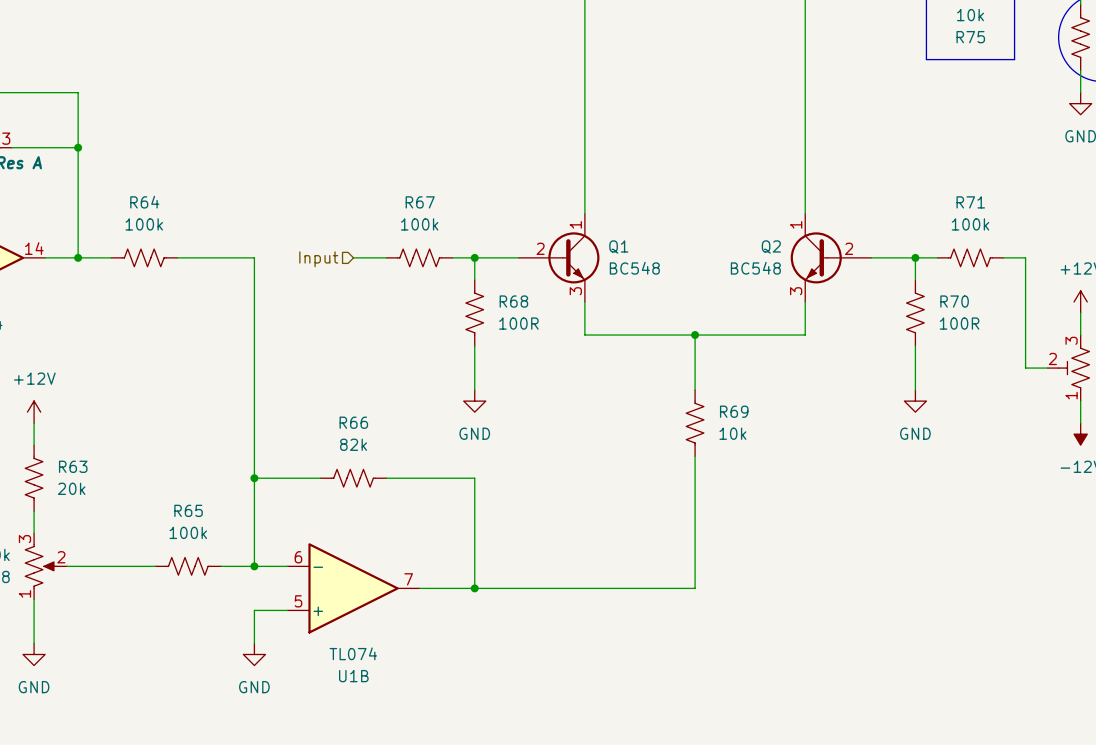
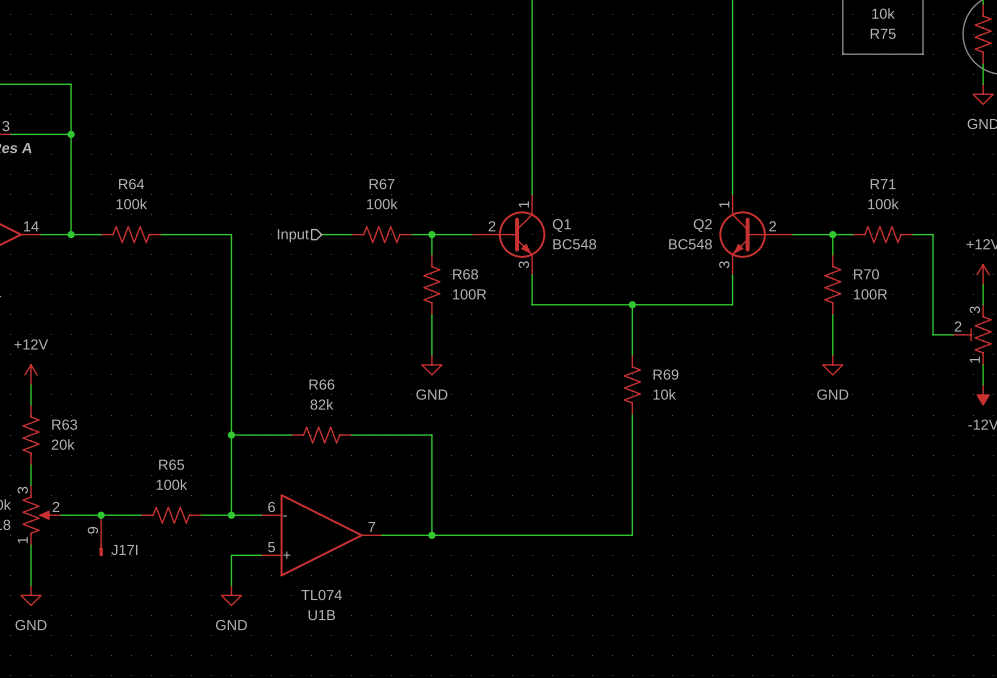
junction: none -> (101, 515)
J17I: none -> (101, 535)

